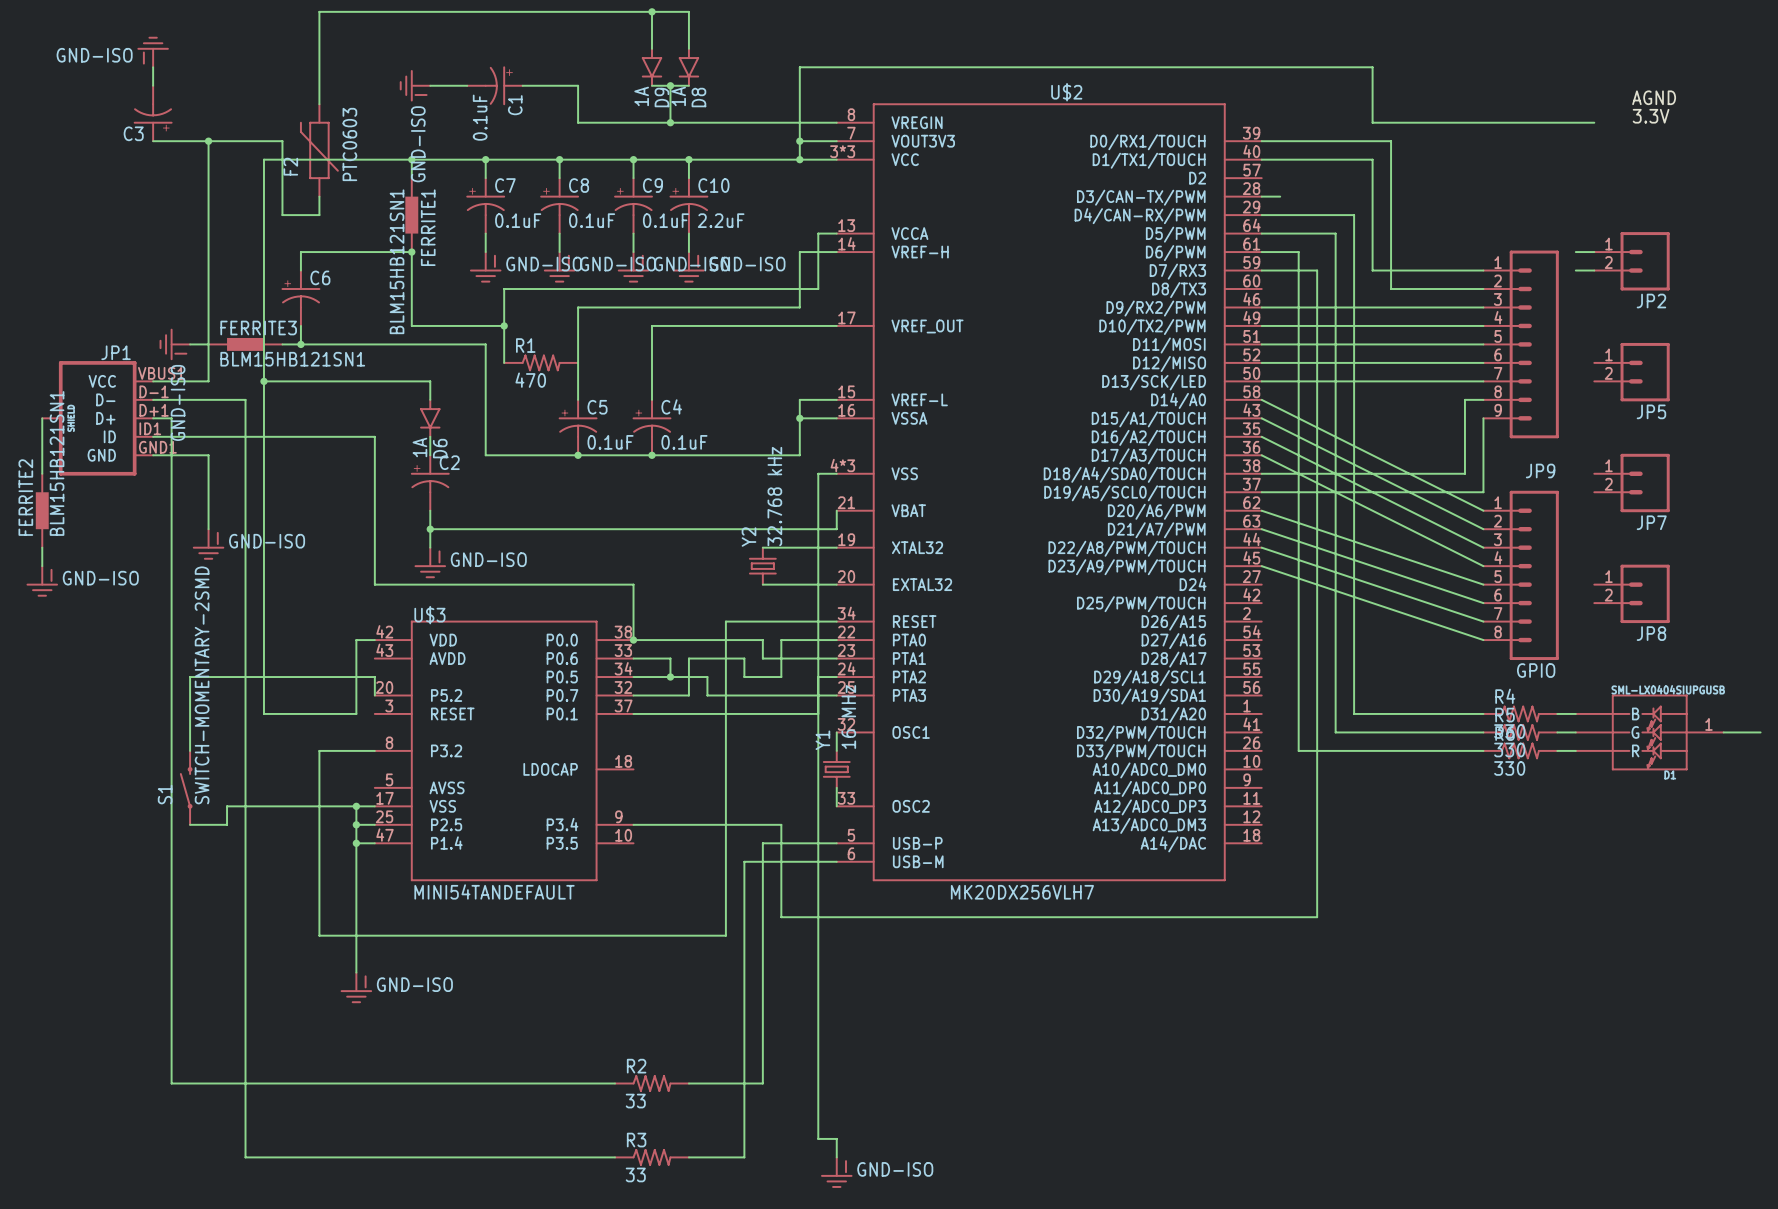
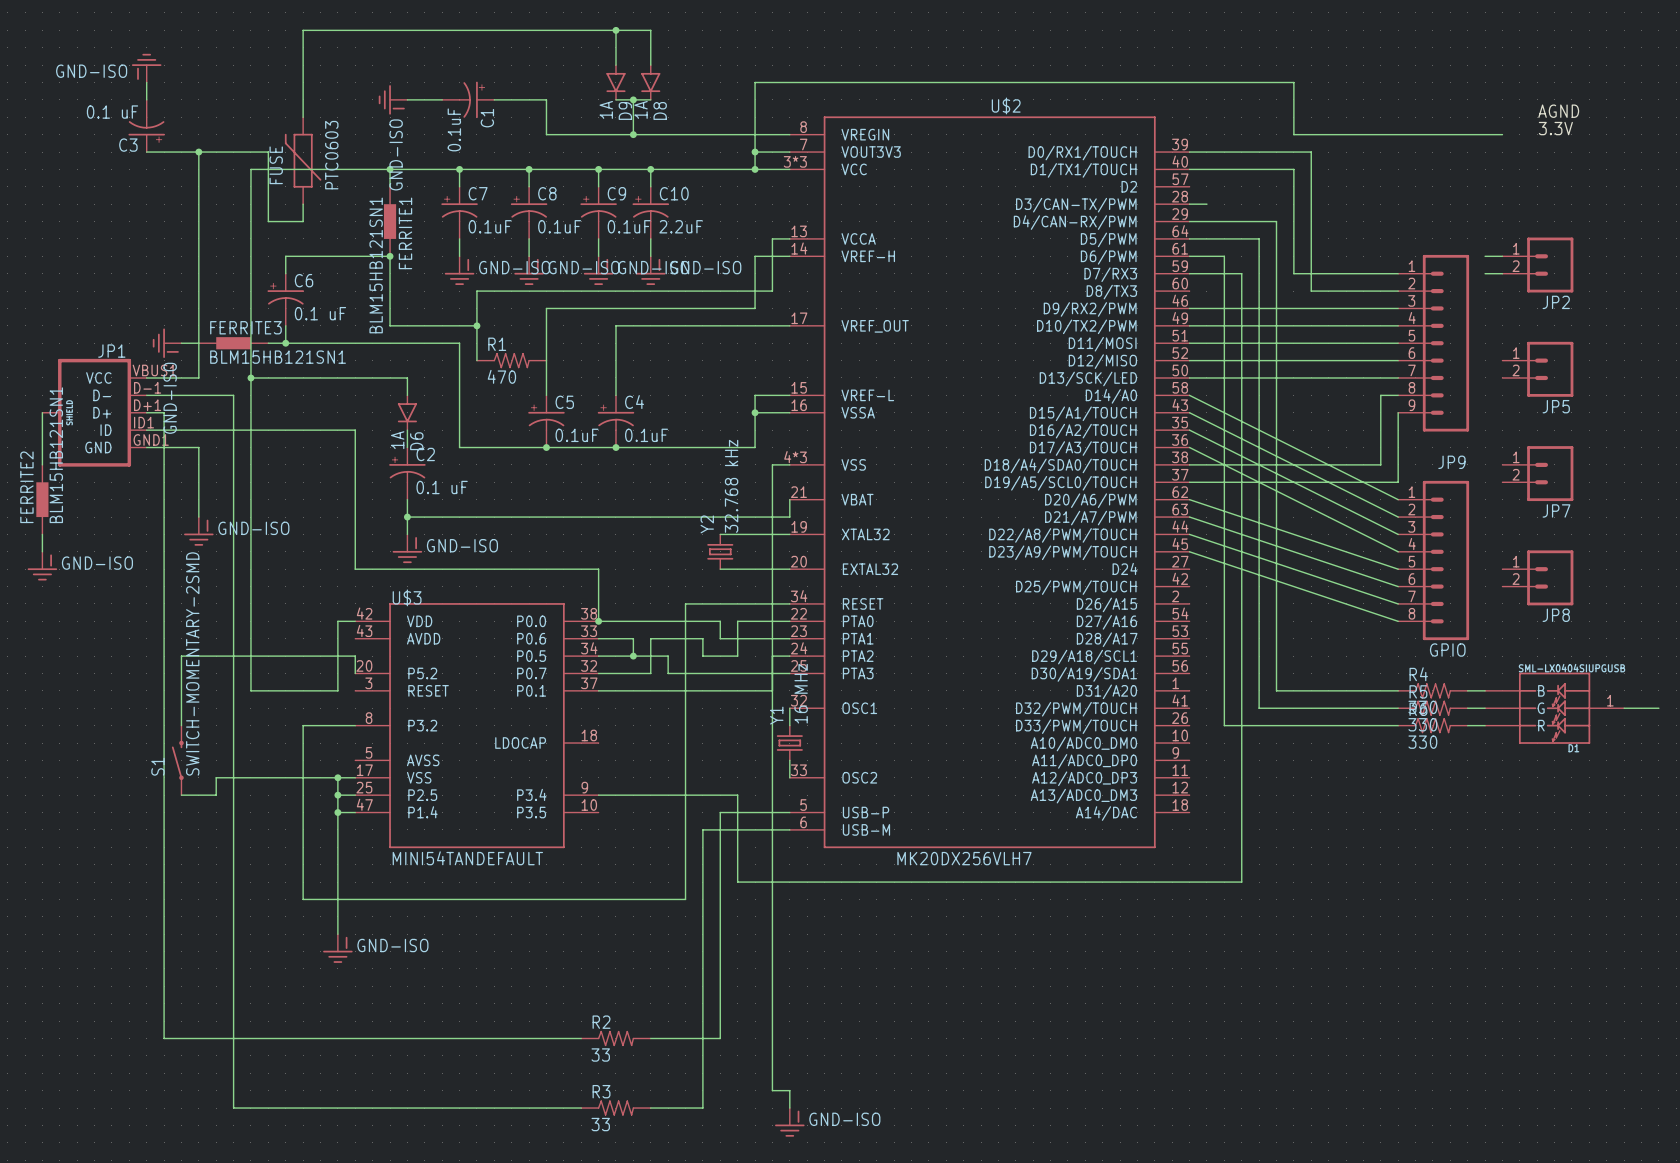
C3 value: none -> 0.1 uF (112, 112)
F2 name: F2 (290, 166) -> FUSE (276, 165)
C6 value: none -> 0.1 uF (320, 313)
C2 value: none -> 0.1 uF (442, 487)

